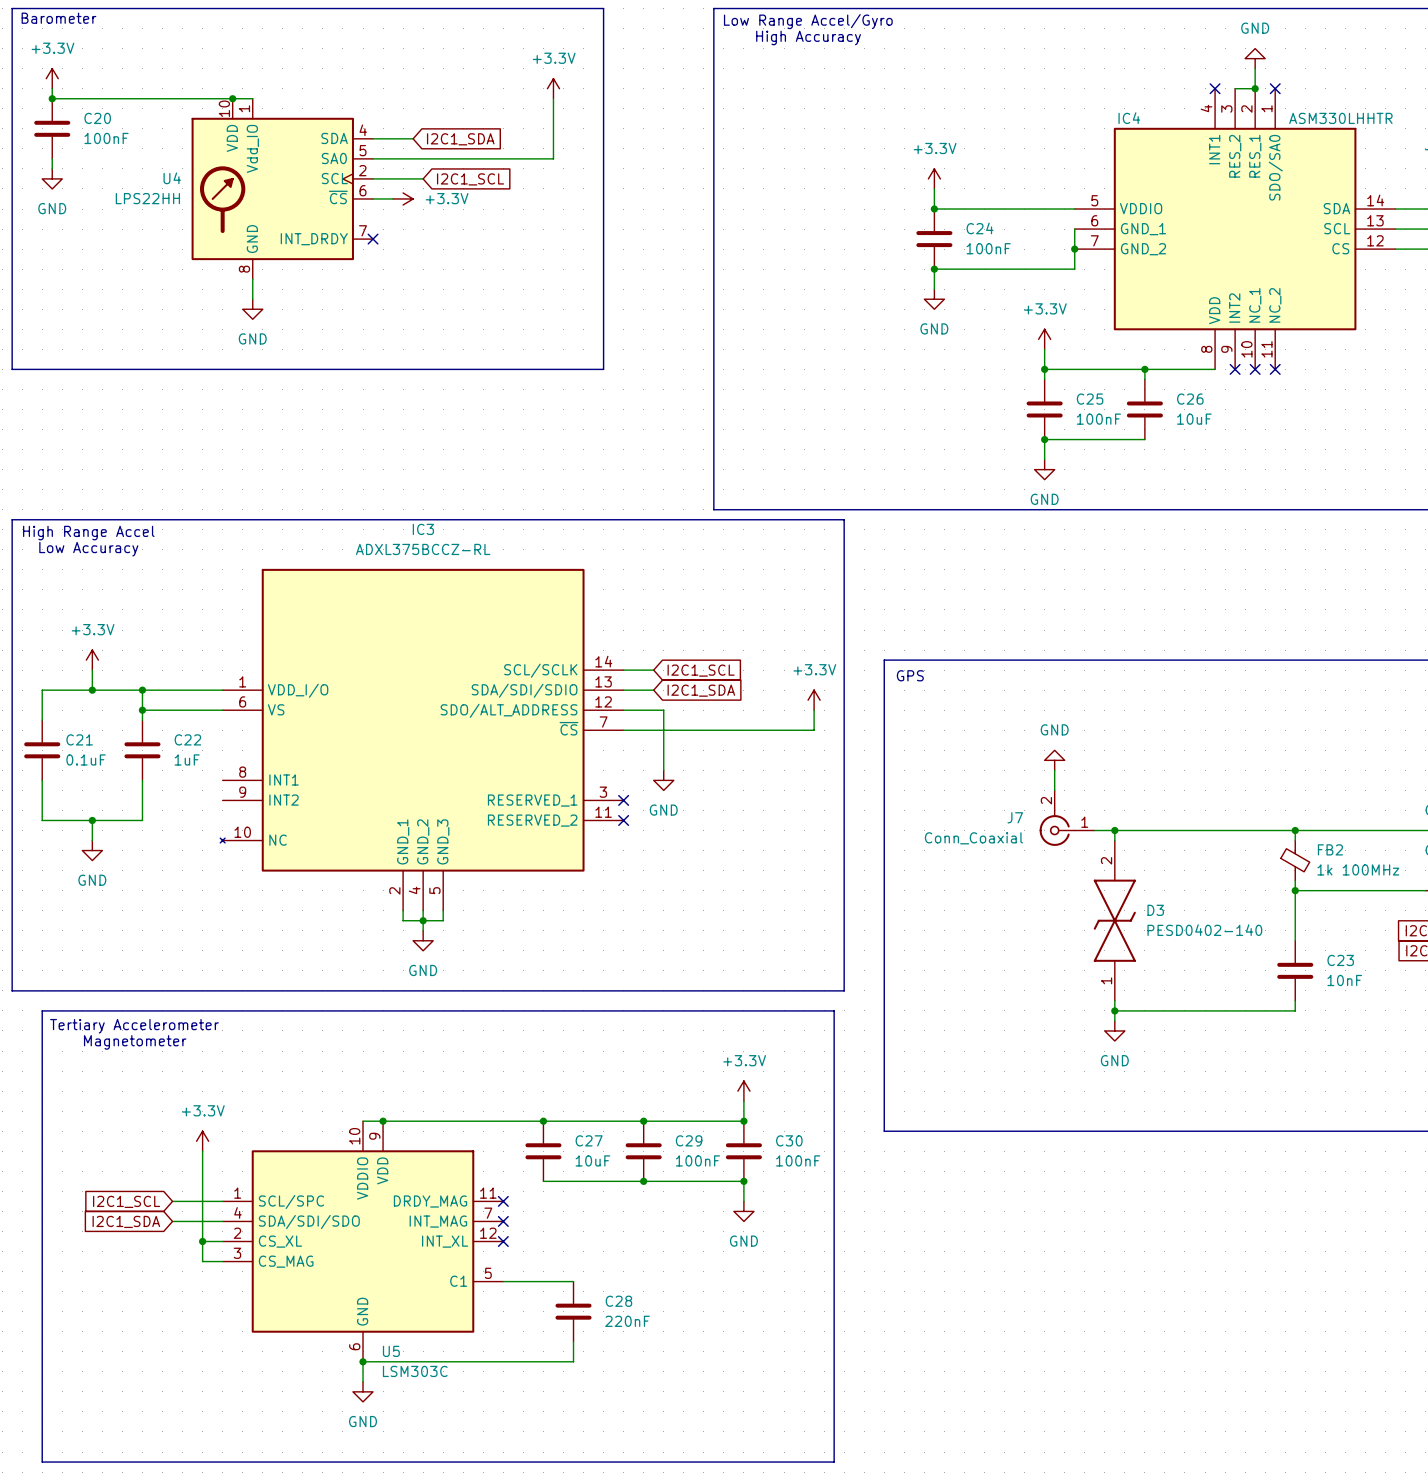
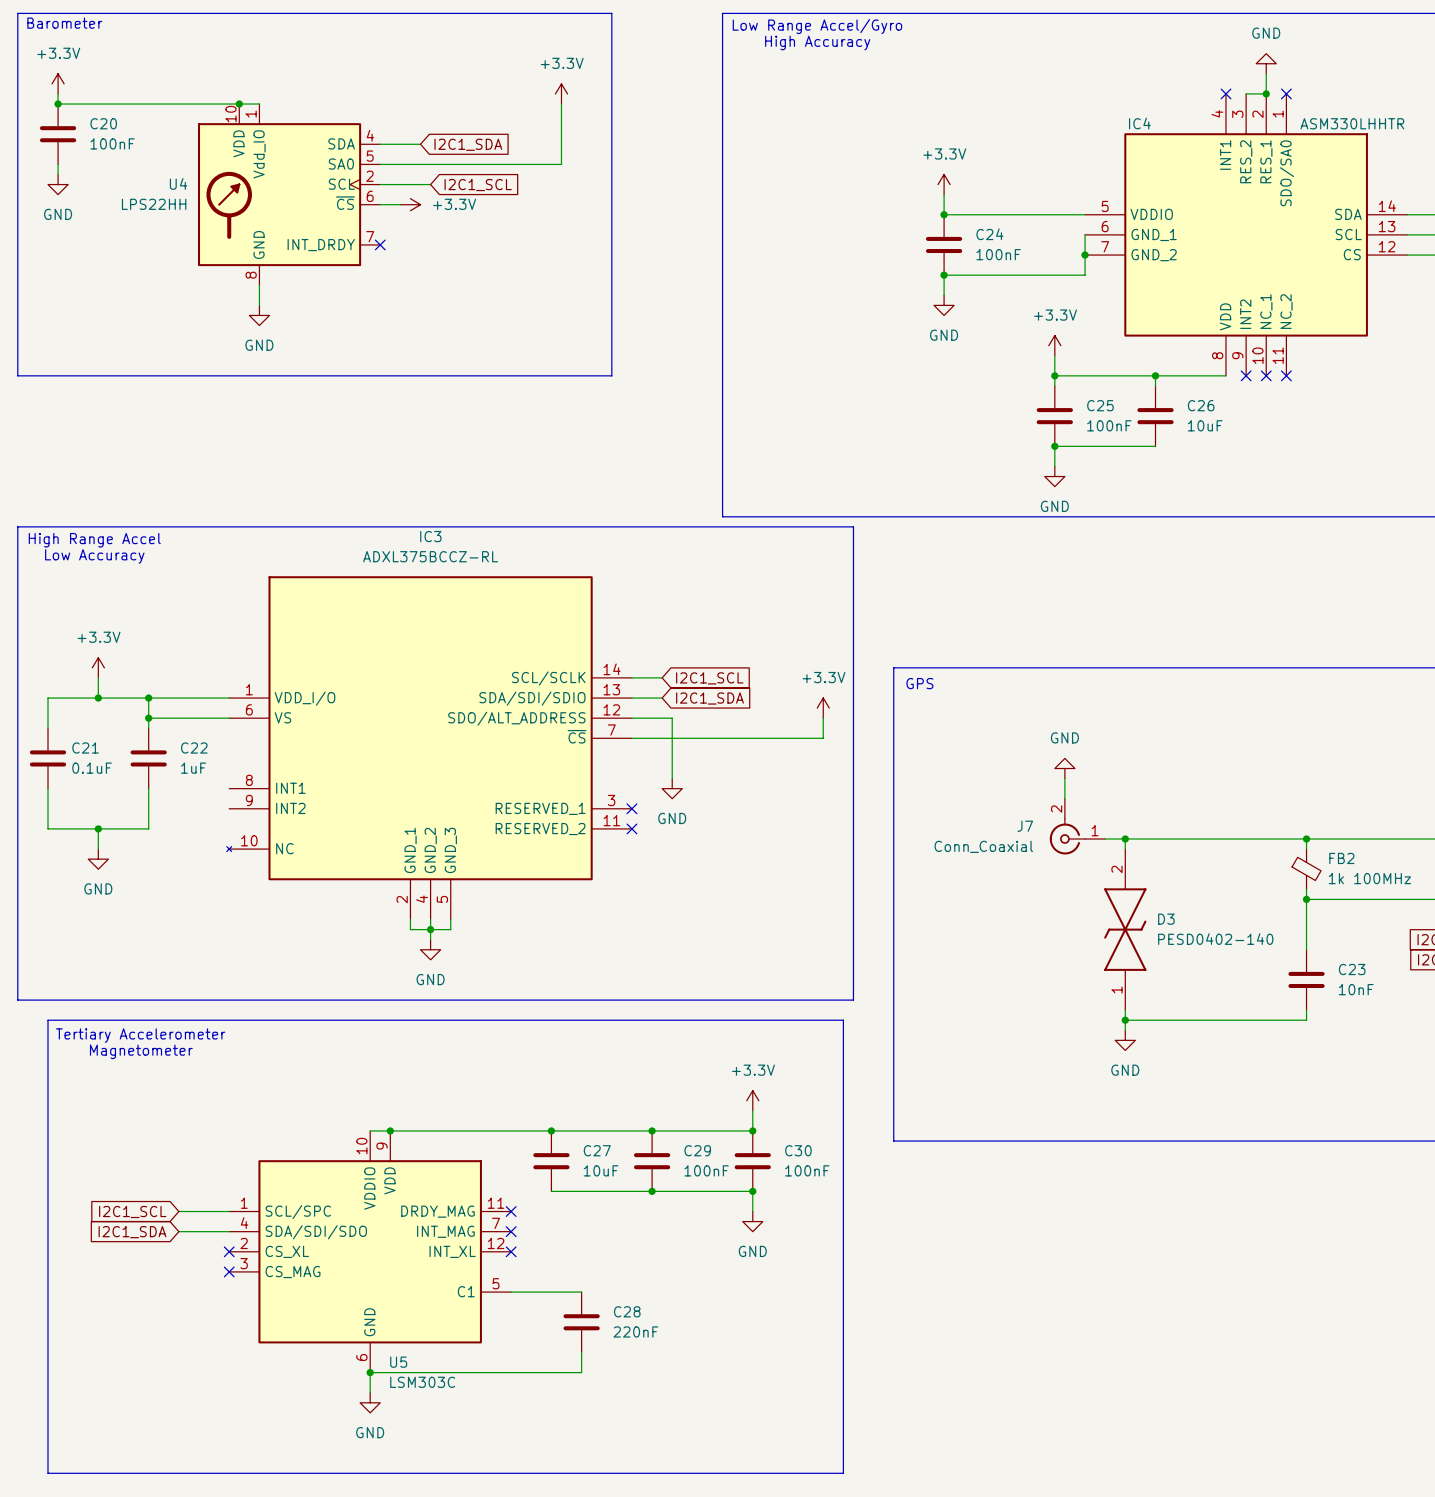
power symbol: +3.3V (202, 1141) -> none
wire: (202, 1151) (202, 1261) (222, 1261) -> none
wire: (202, 1241) (222, 1241) -> none
junction: (202, 1241) -> none
no-connect mark: none -> (229, 1251)
no-connect mark: none -> (229, 1271)

